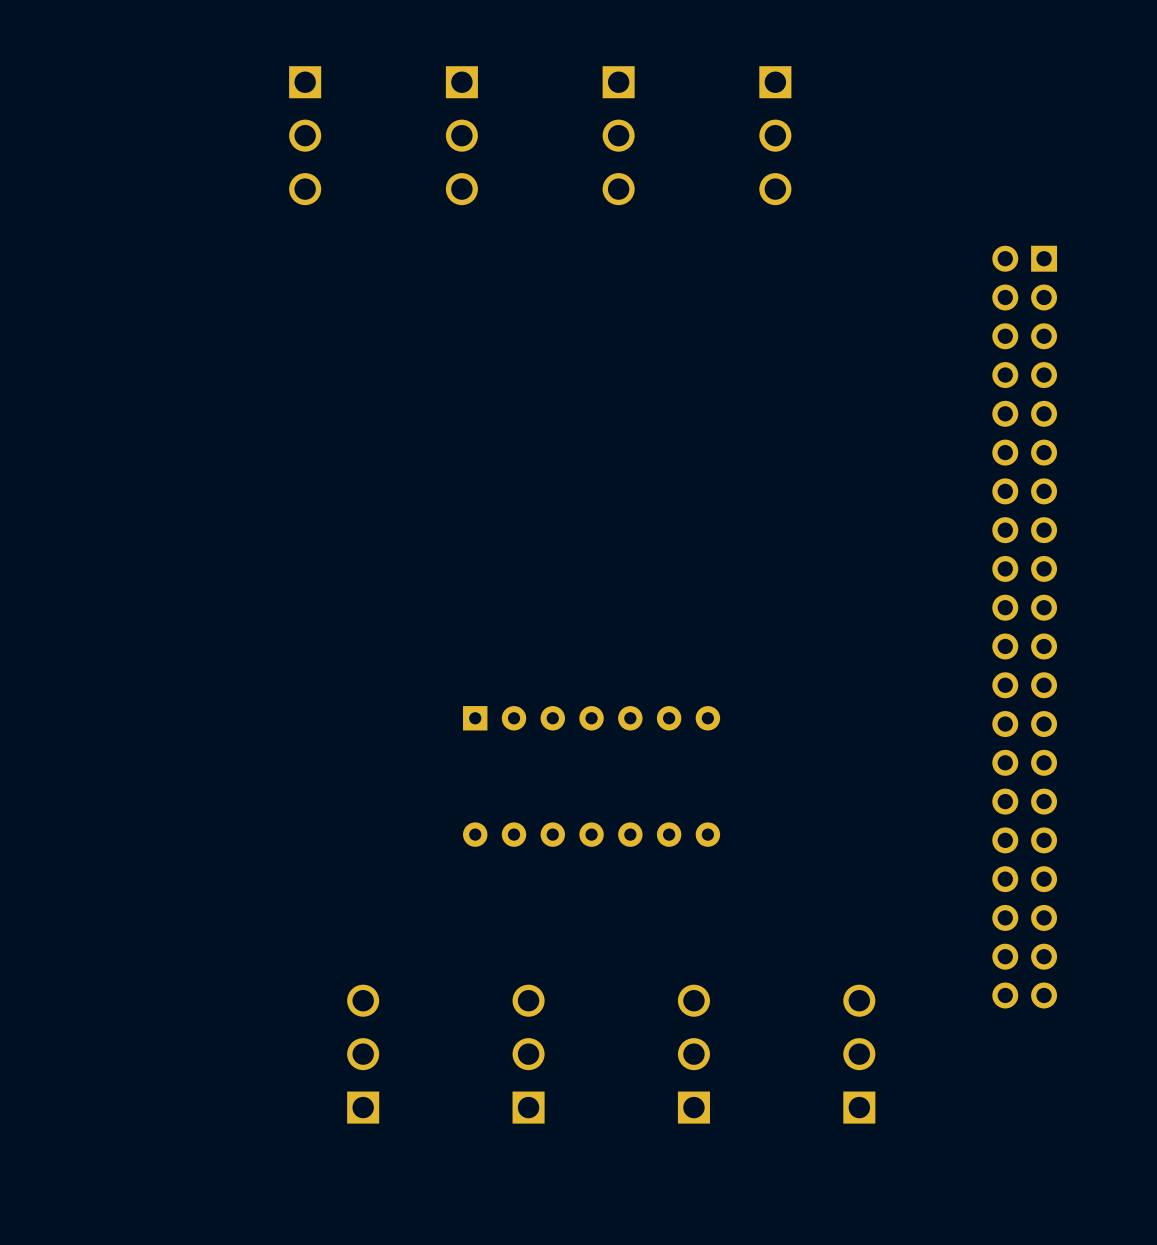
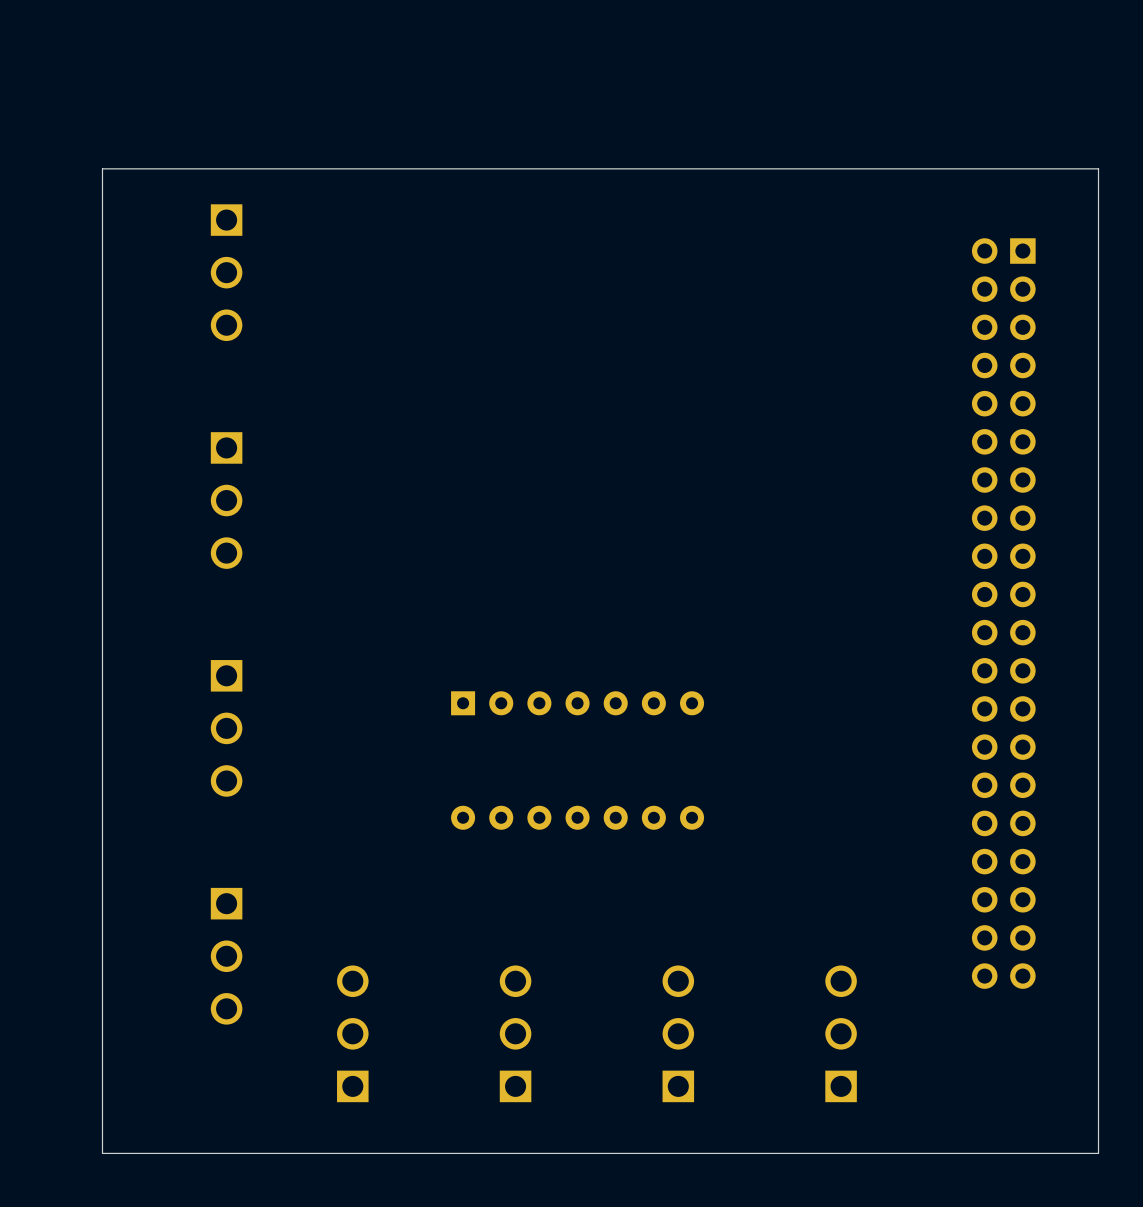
part: (305, 135) -> none
part: (461, 135) -> none
part: (618, 135) -> none
part: (775, 135) -> none
board edge: none -> (1098, 168) (102, 168) (102, 1153) (1098, 1153) (1098, 168)
part: none -> (226, 272)
part: none -> (226, 500)
part: none -> (226, 728)
part: none -> (226, 956)

